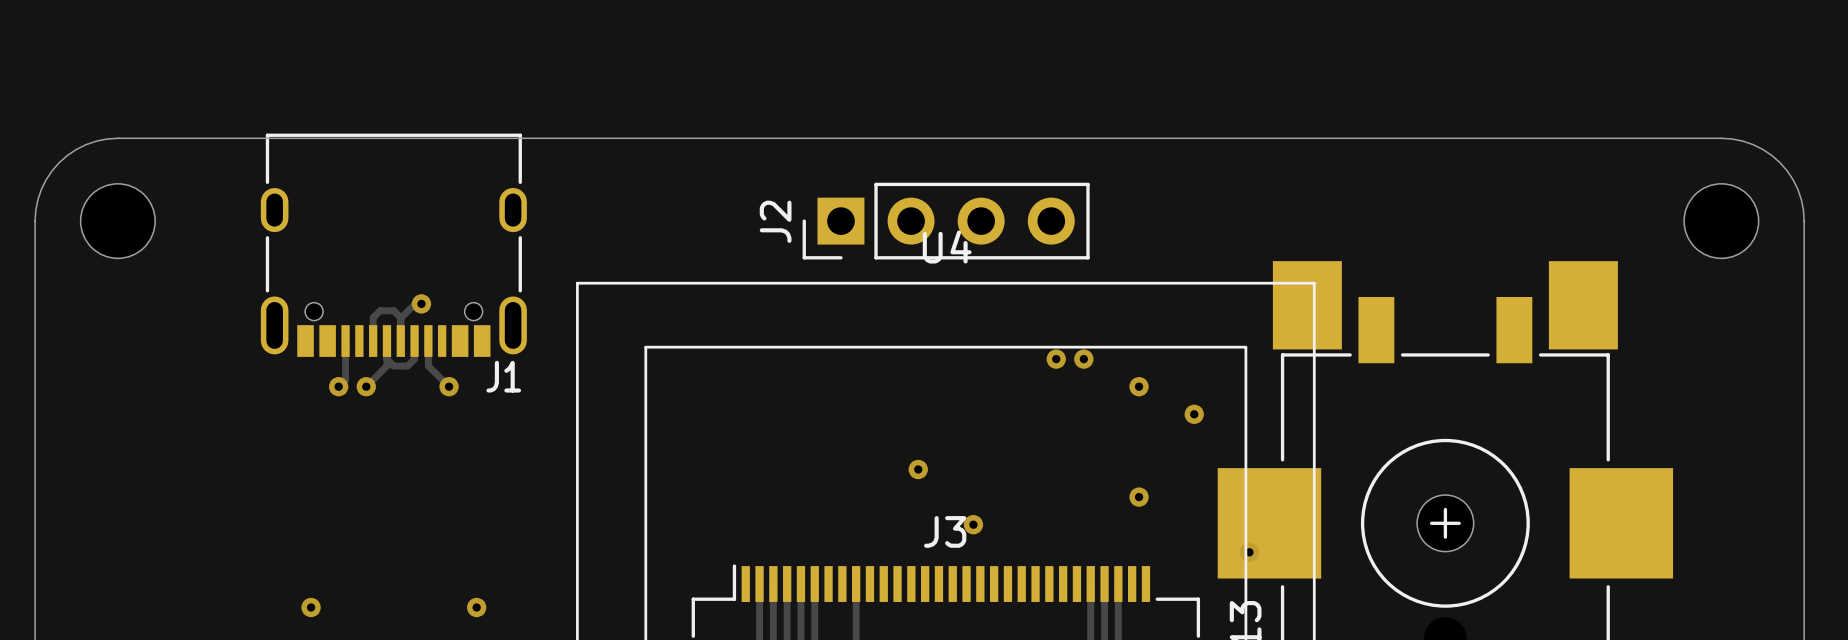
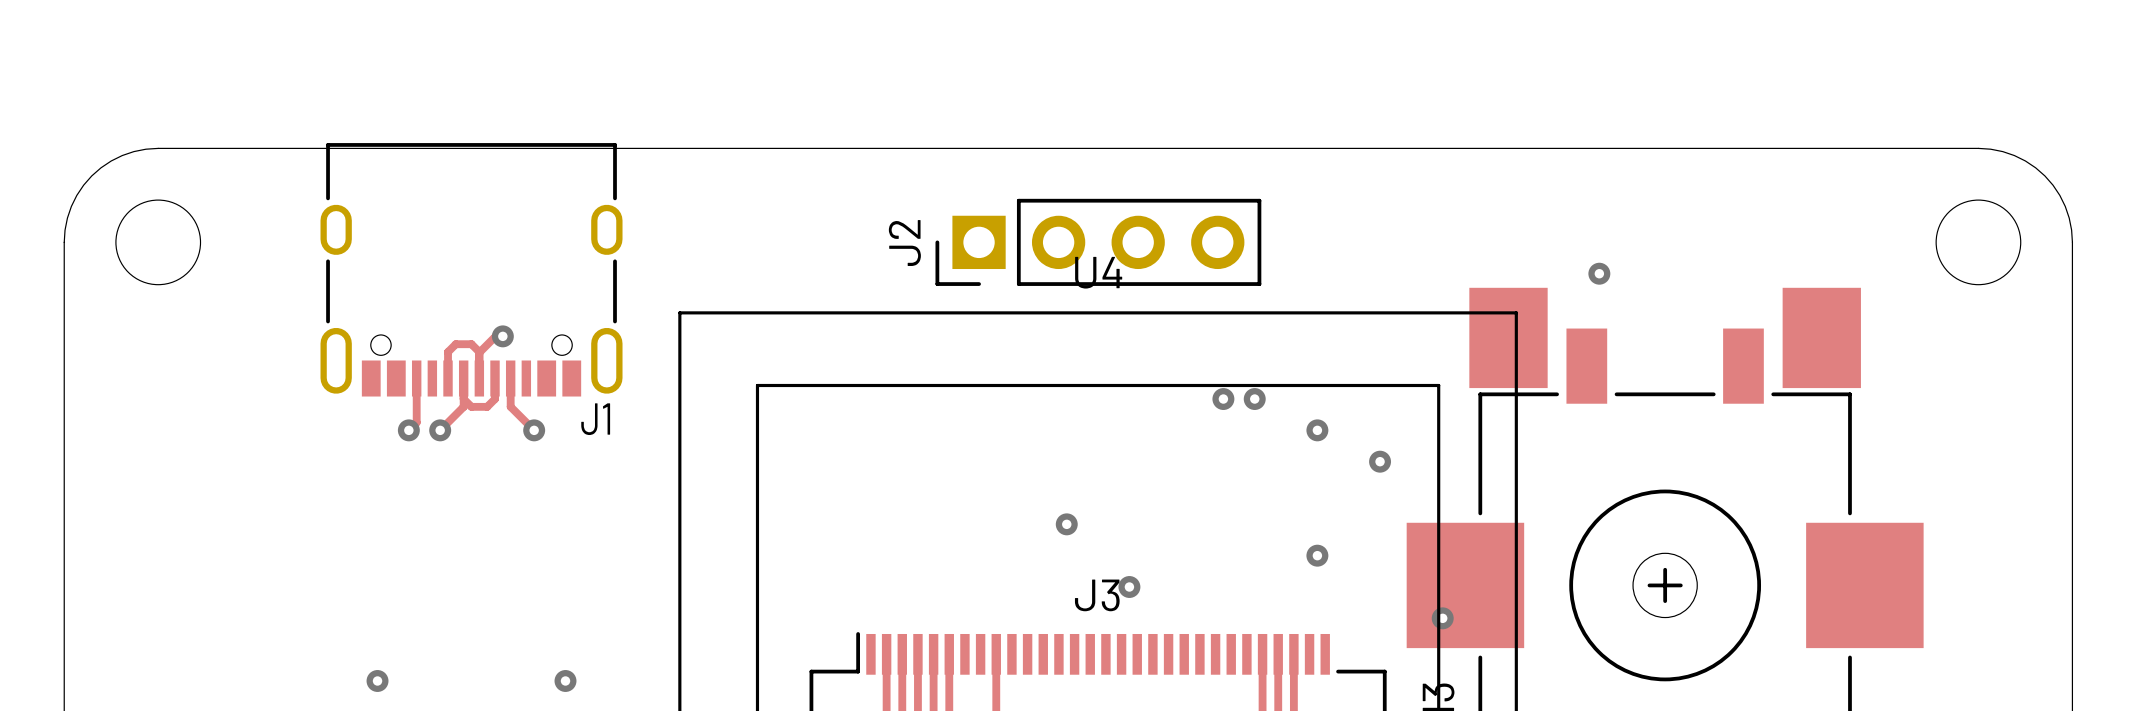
via: none -> (1599, 273)

